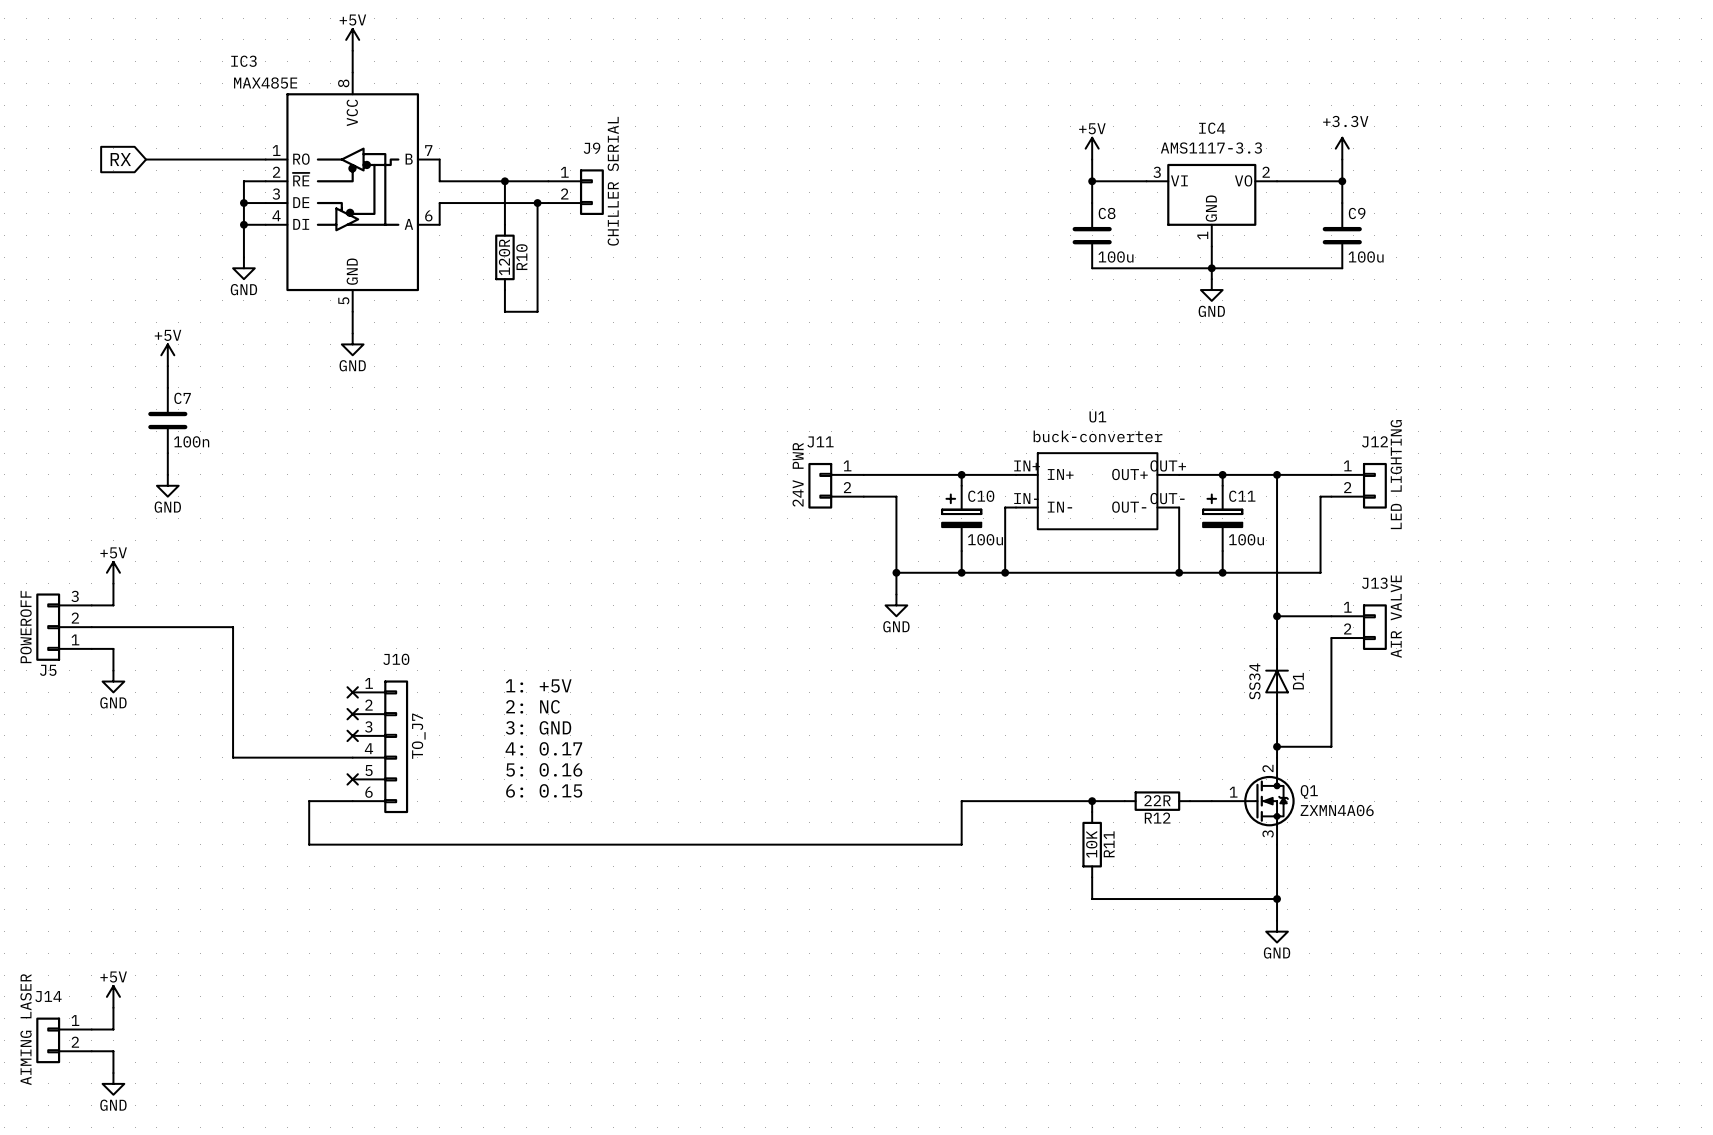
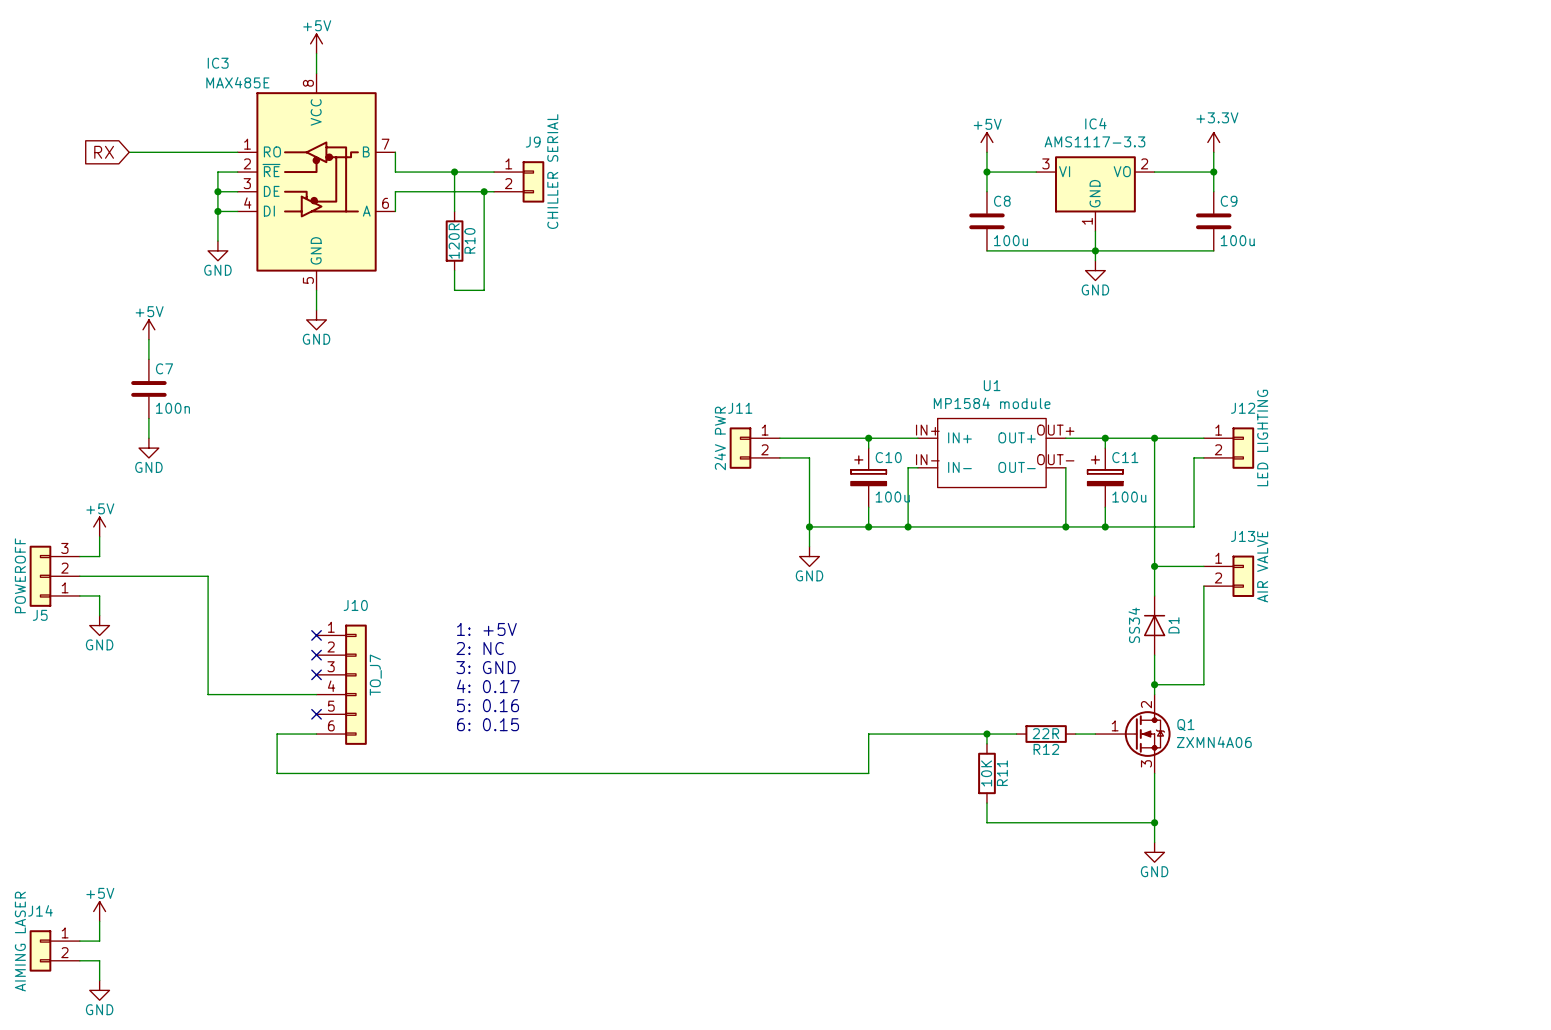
U1 value: buck-converter (1098, 436) -> MP1584 module (992, 403)

